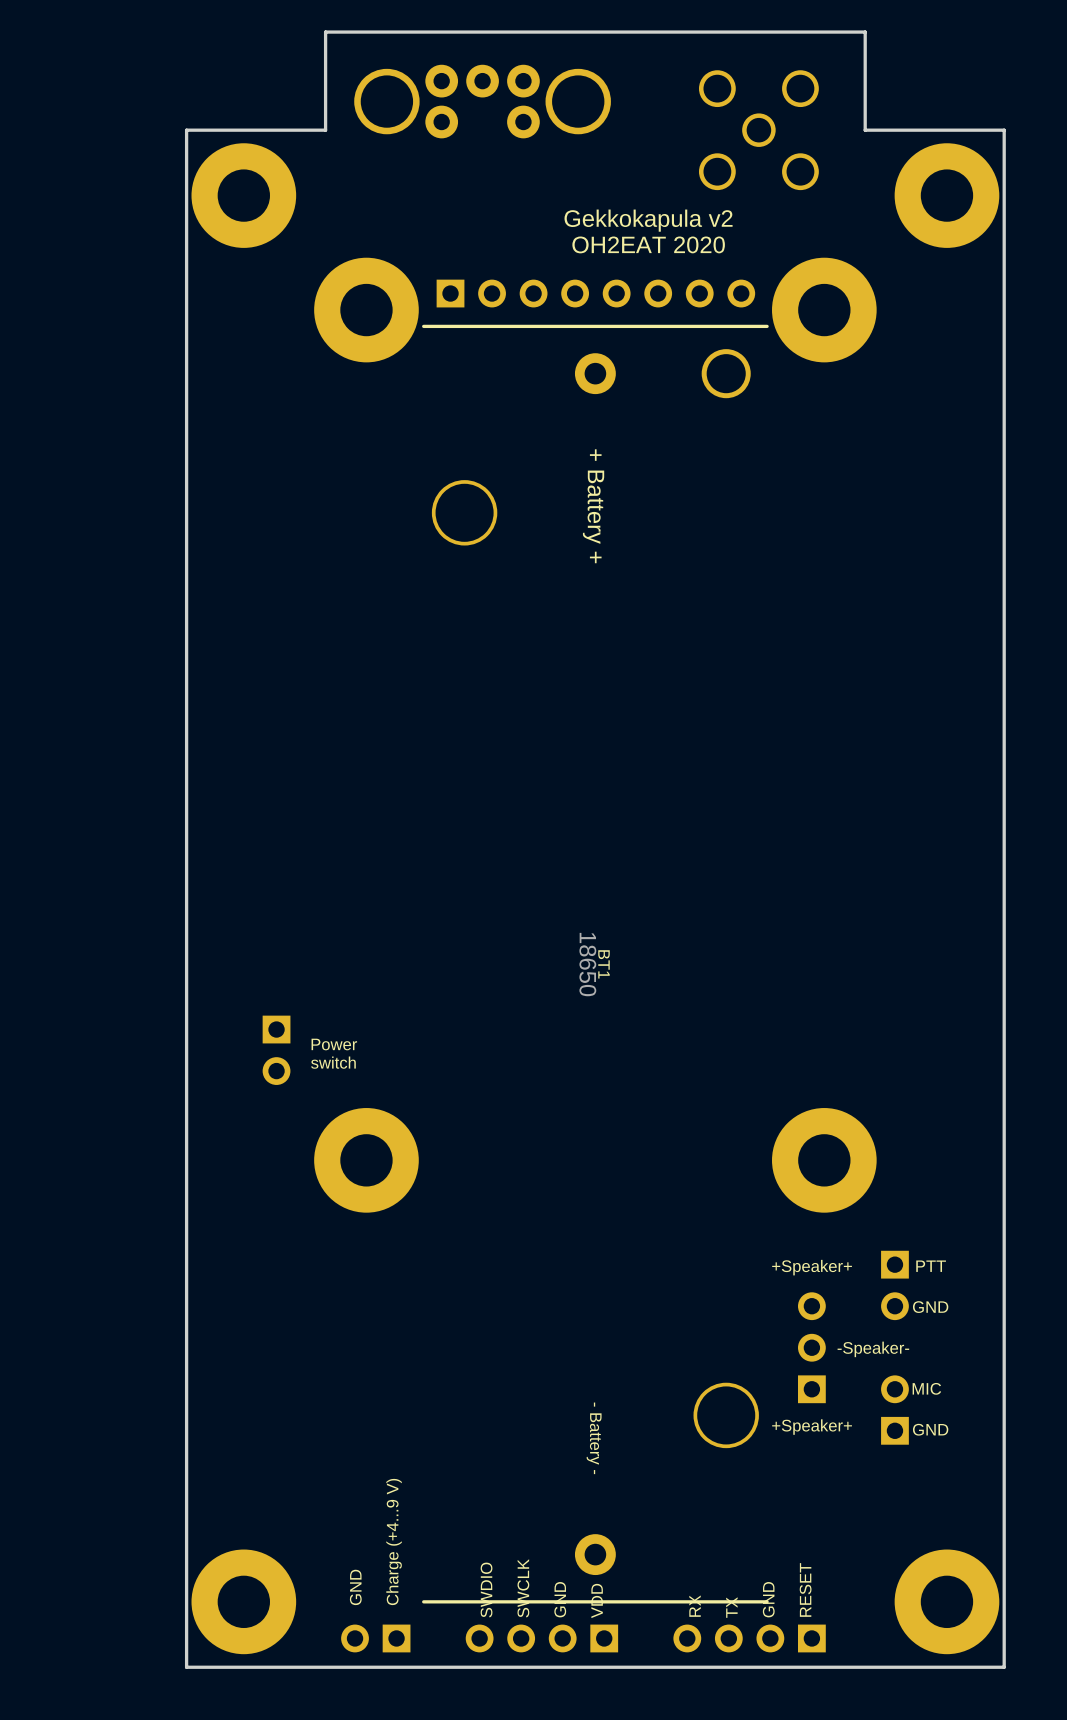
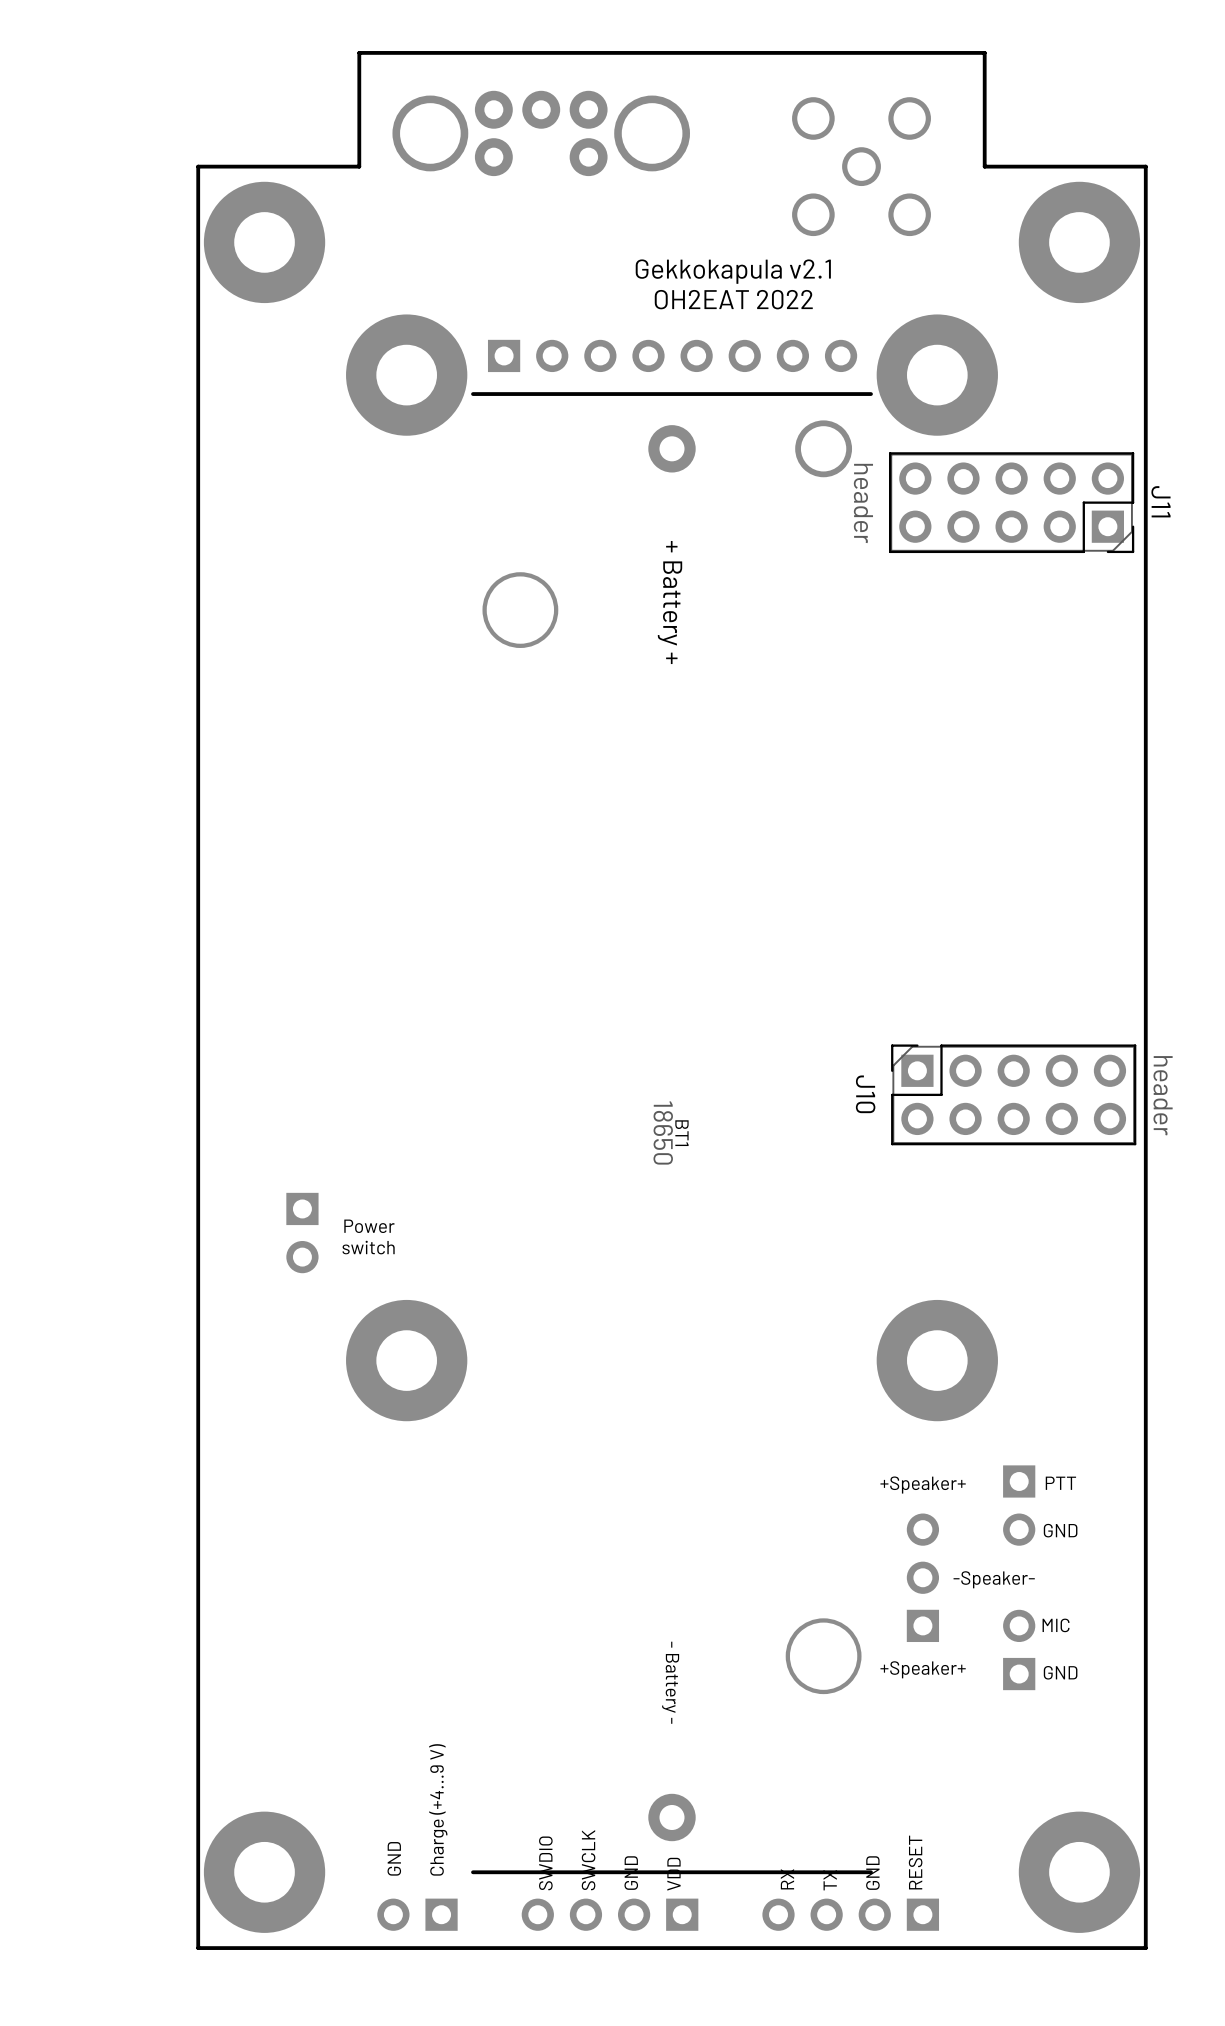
text: Gekkokapula v2 (648, 220) -> Gekkokapula v2.1 (733, 271)
text: OH2EAT 2020 (648, 244) -> OH2EAT 2022 (733, 299)
J11: none -> header (1011, 502)
J10: none -> header (1013, 1094)

